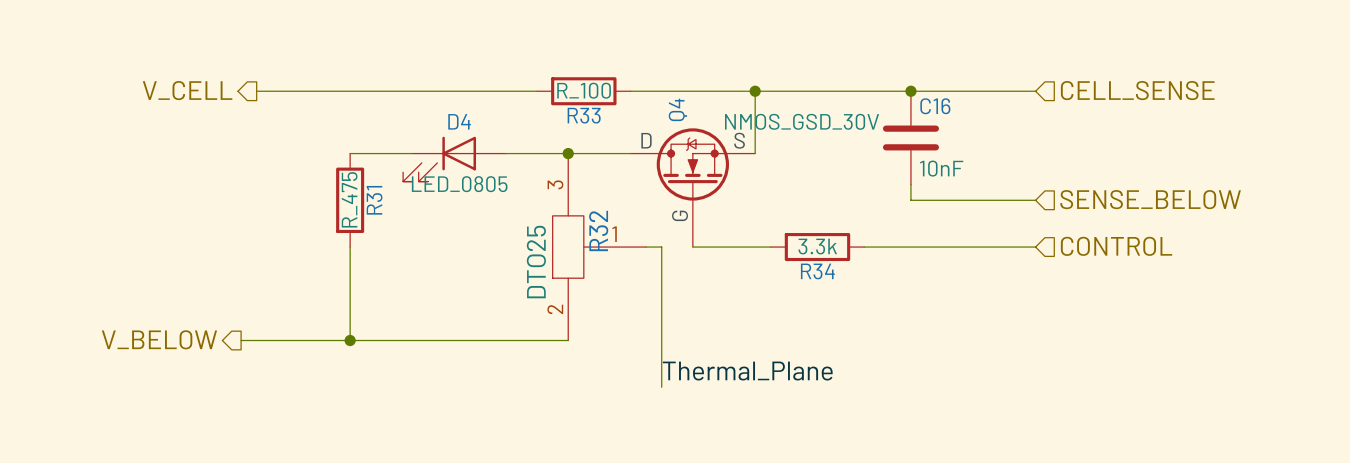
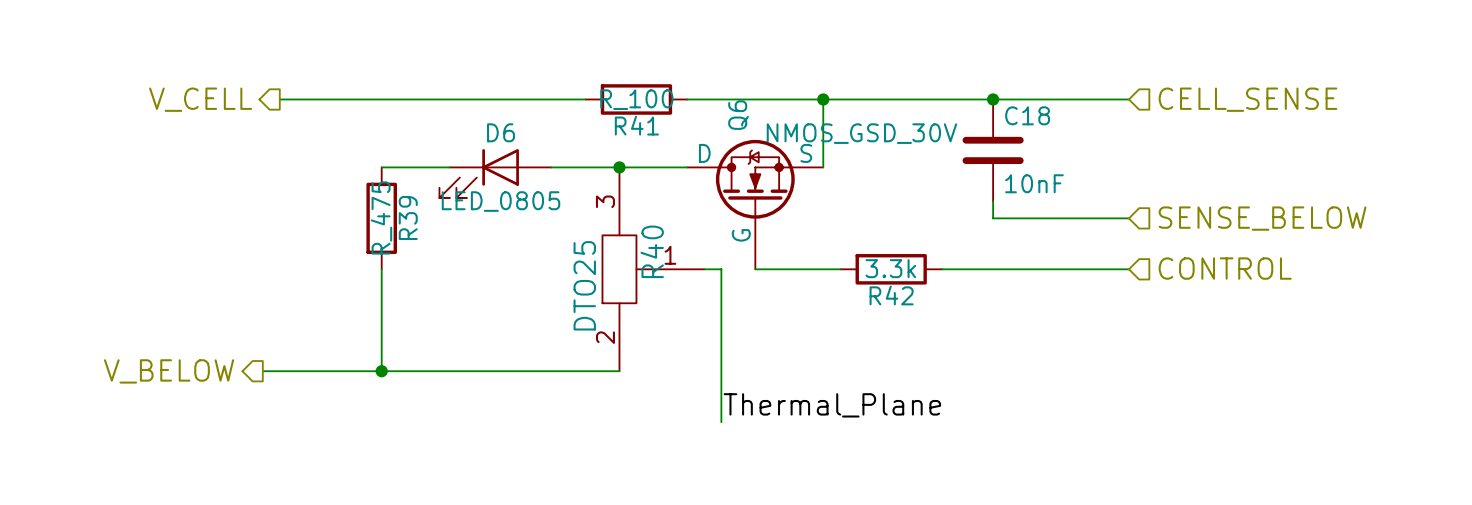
C16 name: C16 (935, 106) -> C18 (1027, 115)
Q4 name: Q4 (677, 109) -> Q6 (738, 115)
R33 name: R33 (584, 115) -> R41 (636, 125)
D4 name: D4 (459, 121) -> D6 (500, 132)
R31 name: R31 (374, 200) -> R39 (408, 217)
R32 name: R32 (598, 230) -> R40 (652, 251)
R34 name: R34 (817, 271) -> R42 (891, 295)

